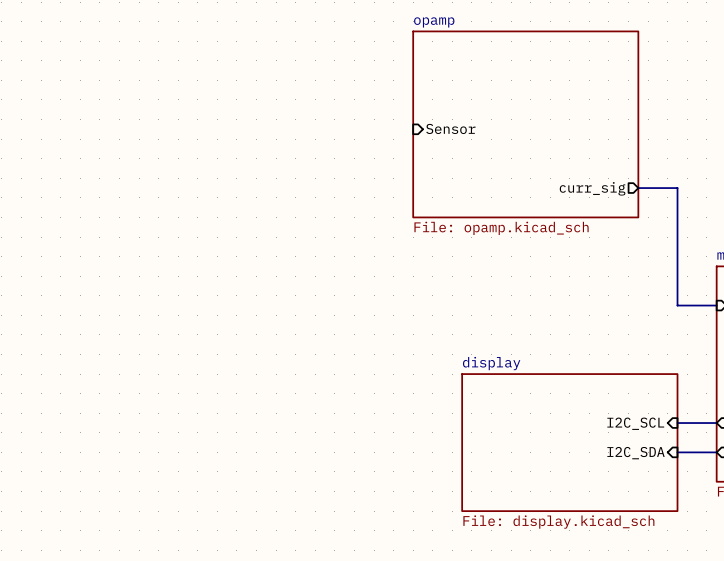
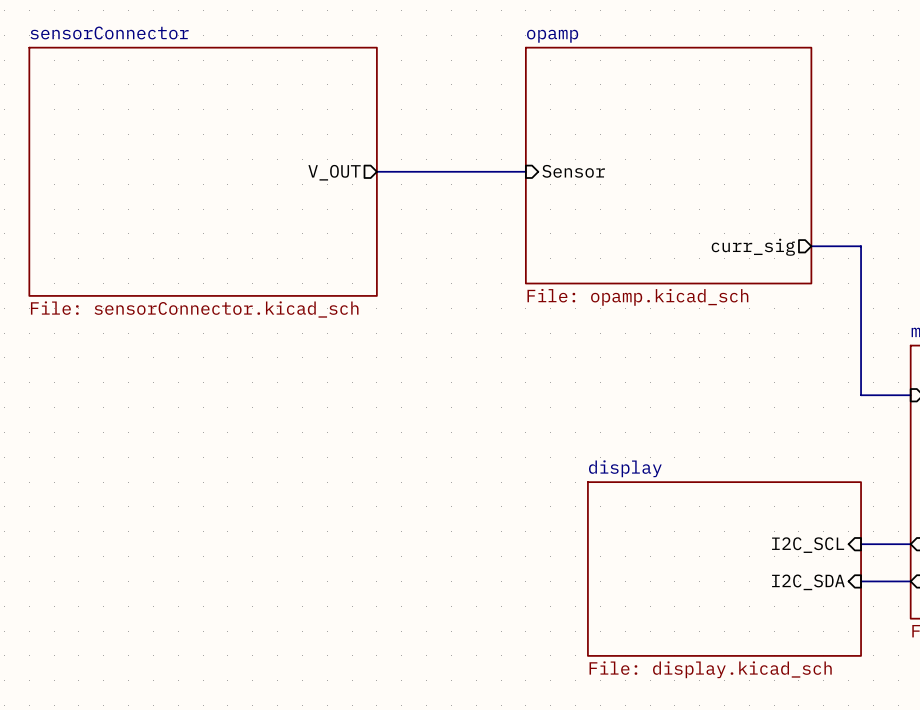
sheet sensorConnector: none -> File: sensorConnector.kicad_sch (203, 171)
wire: none -> (376, 171) (525, 171)
sheet pin: none -> V_OUT (334, 172)

